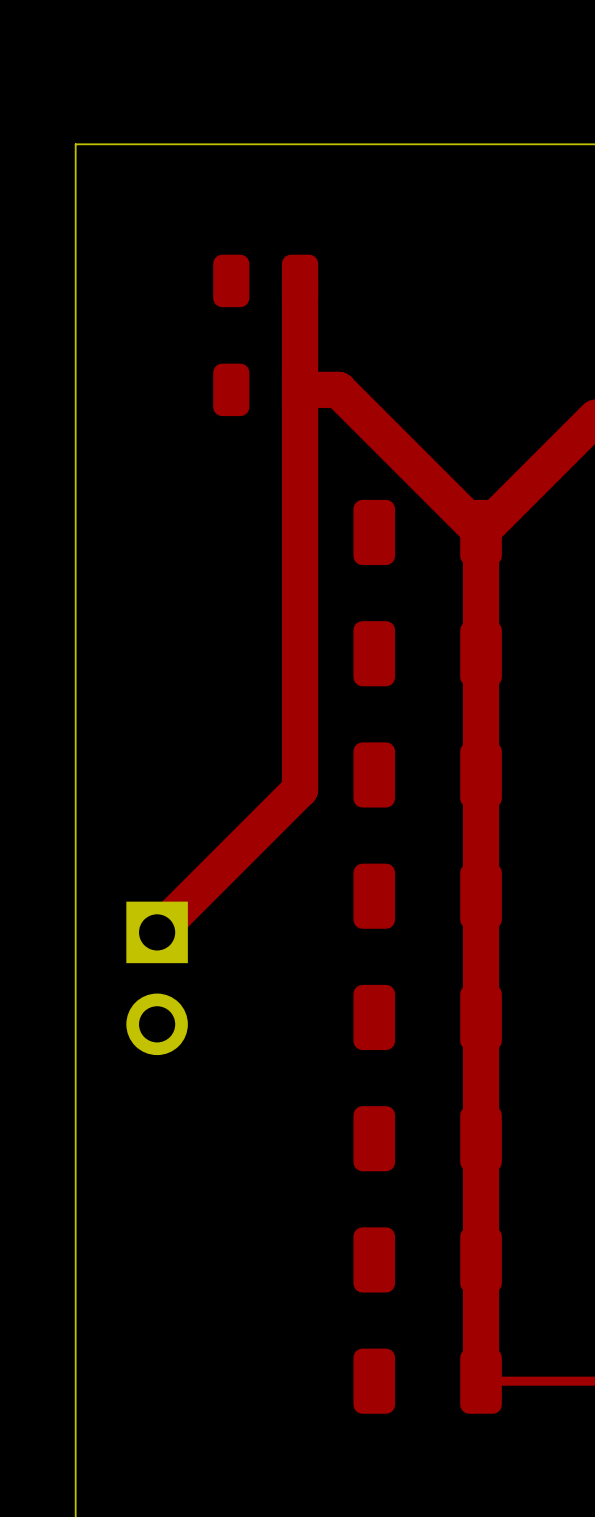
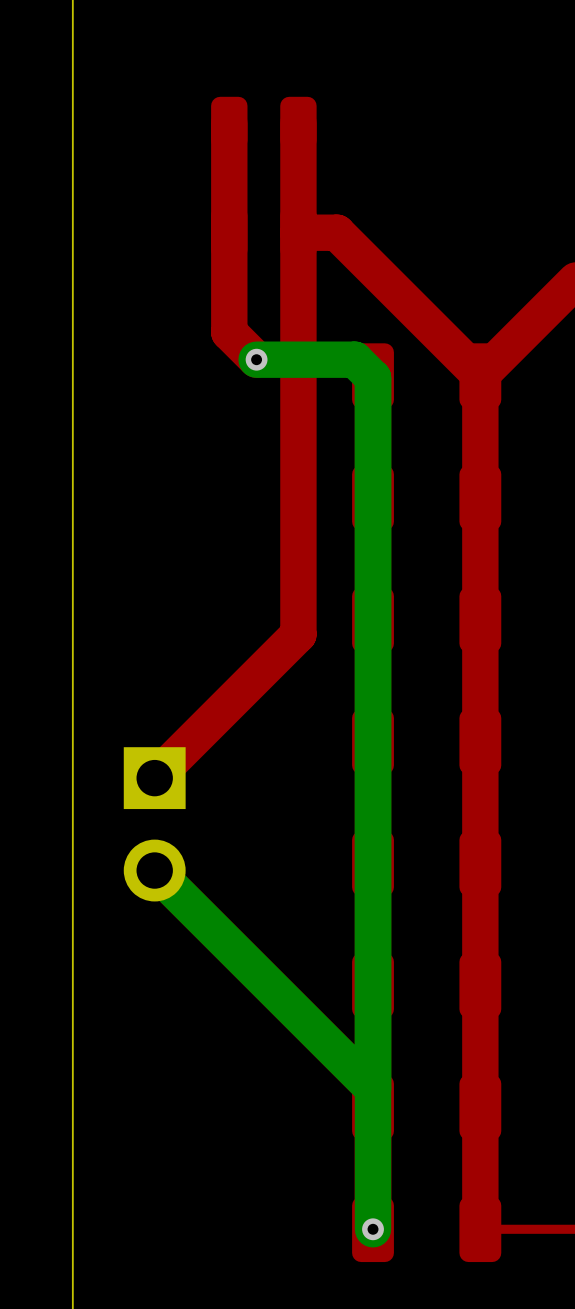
top track: none -> (229, 123) (229, 332) (256, 359)
bottom track: none -> (256, 359) (354, 359) (373, 377) (373, 1229)
via: none -> (256, 359)
bottom track: none -> (154, 870) (373, 1088)
via: none -> (373, 1229)

